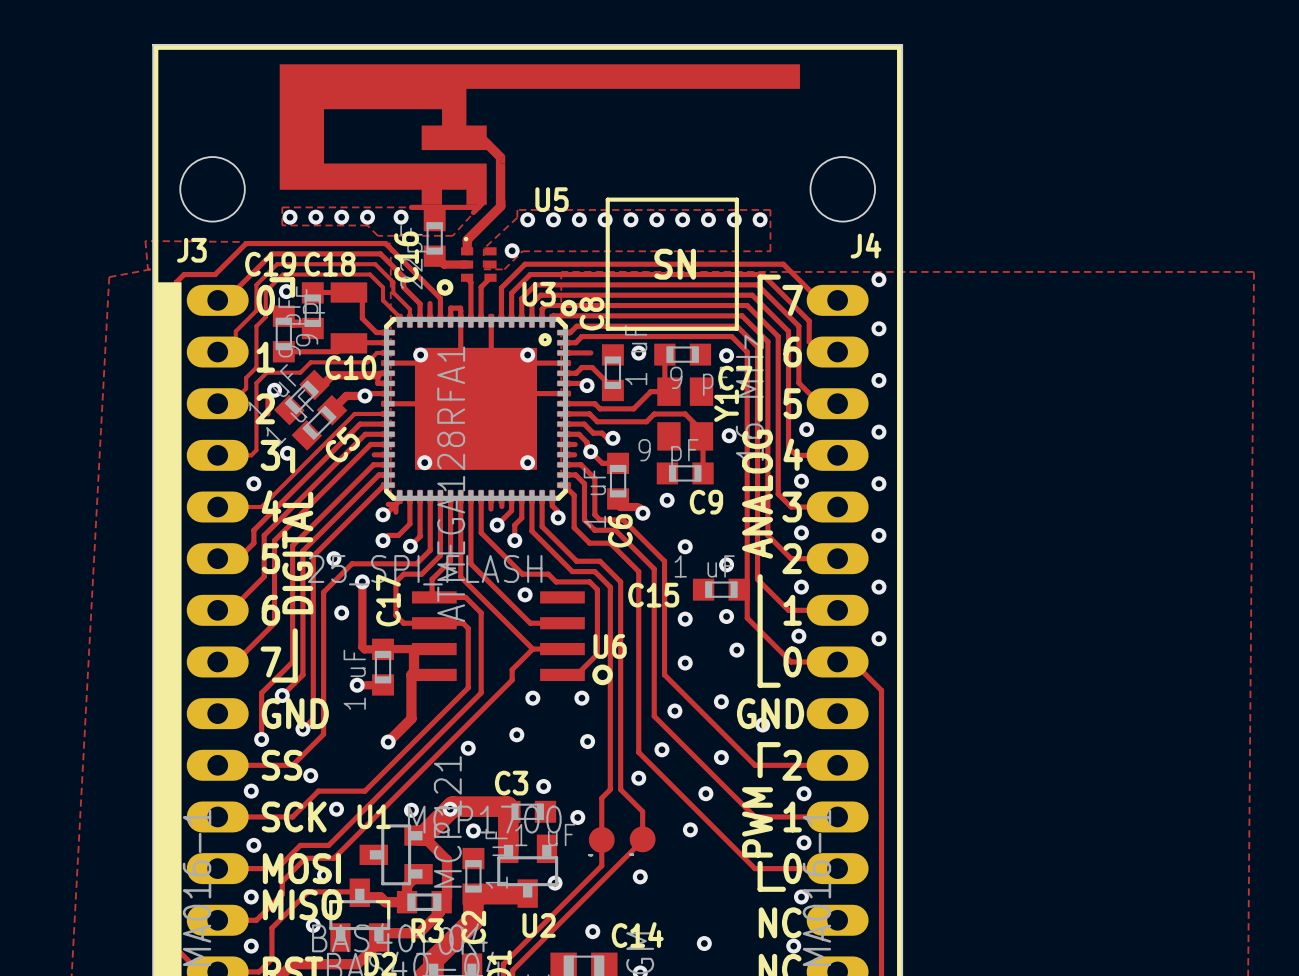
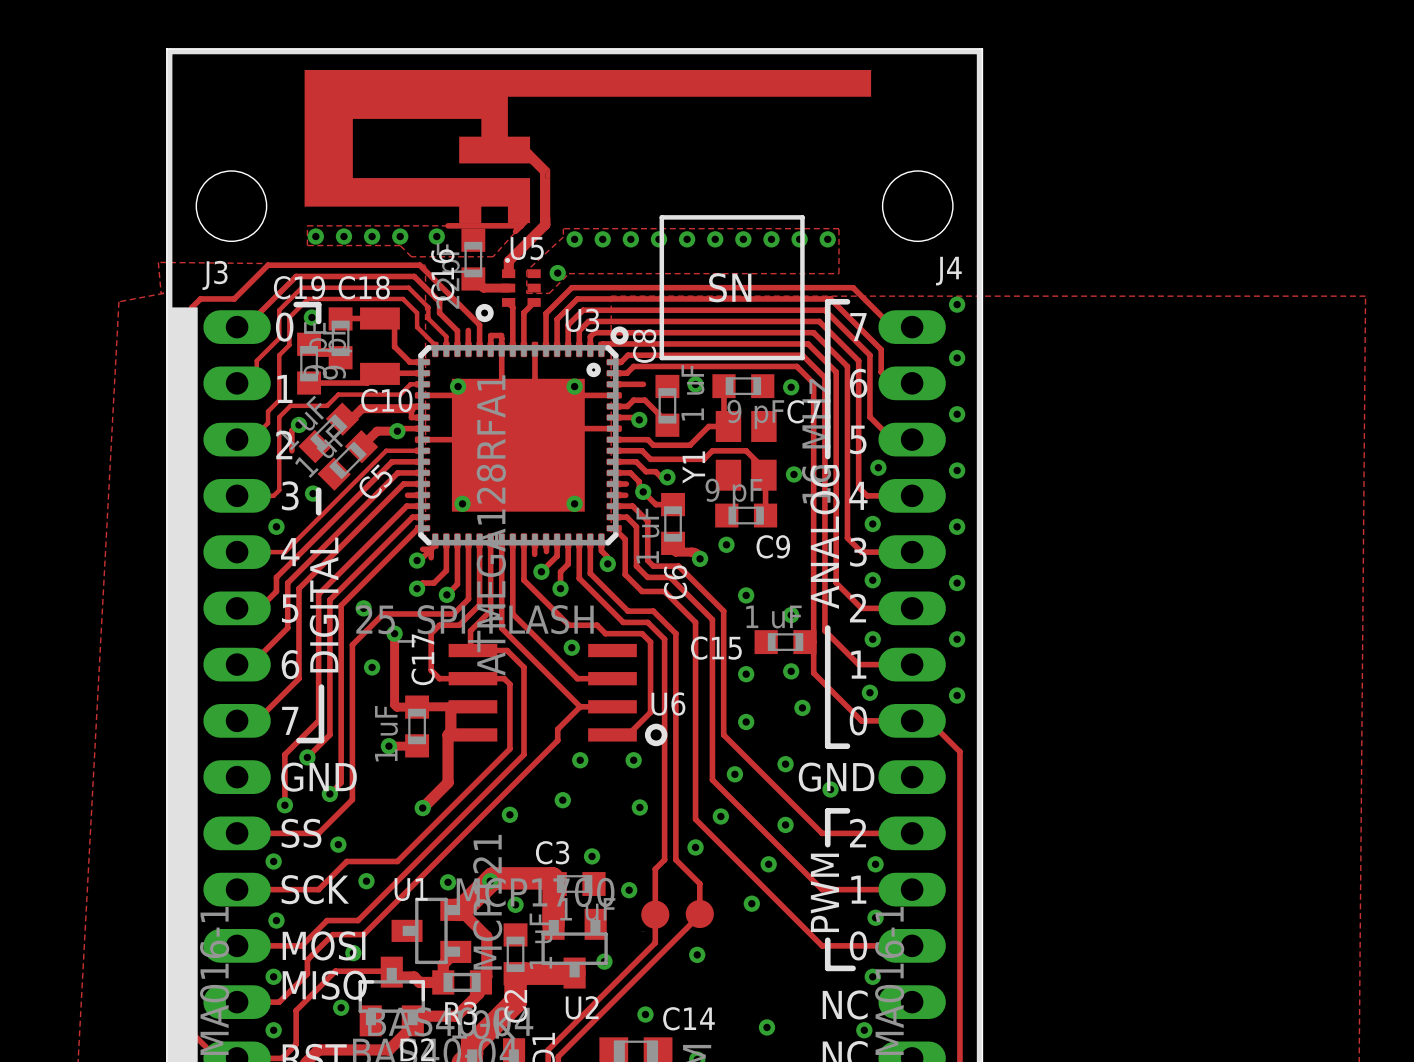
text position: U5 (552, 199) -> U5 (527, 248)
Y1 name position: Y1 (726, 405) -> Y1 (693, 467)

